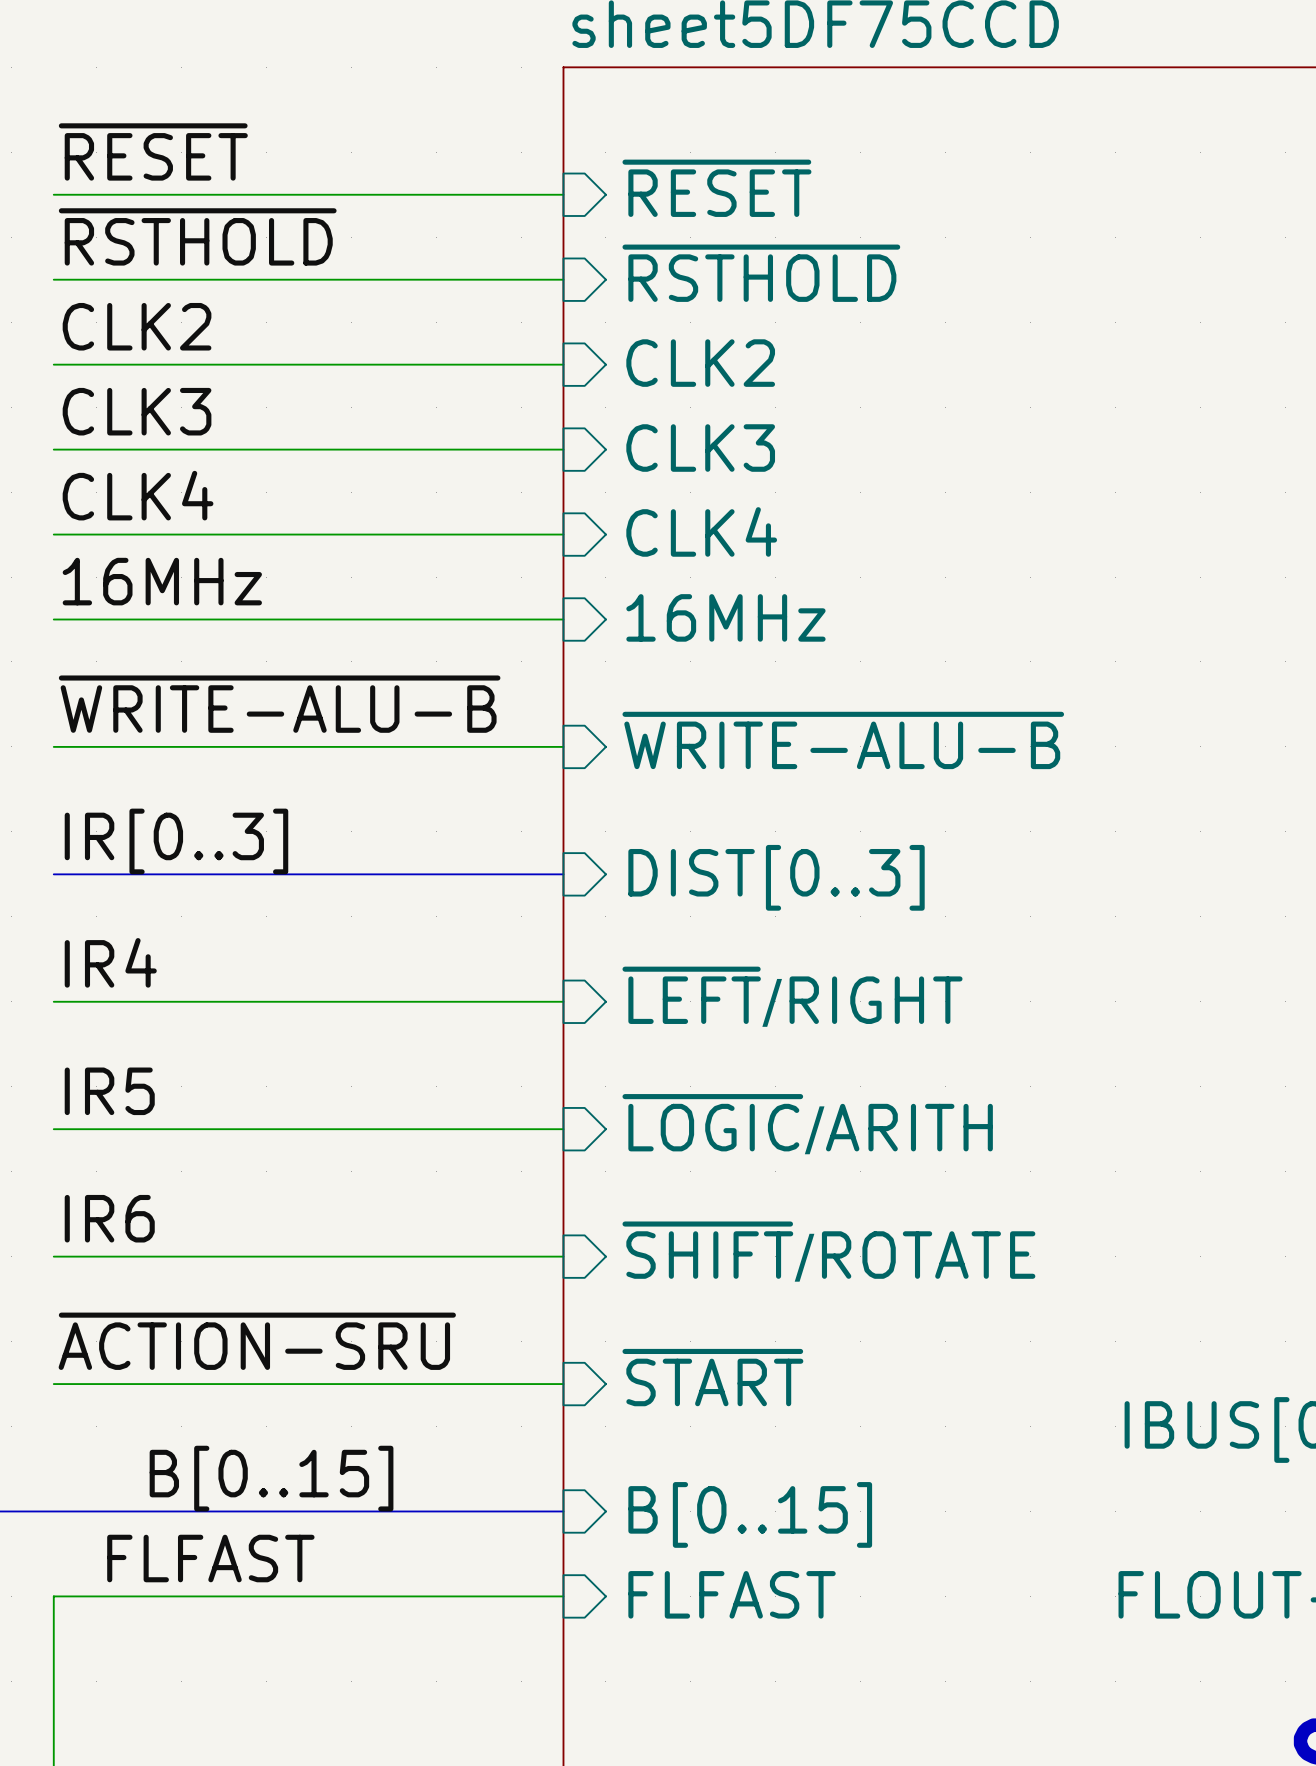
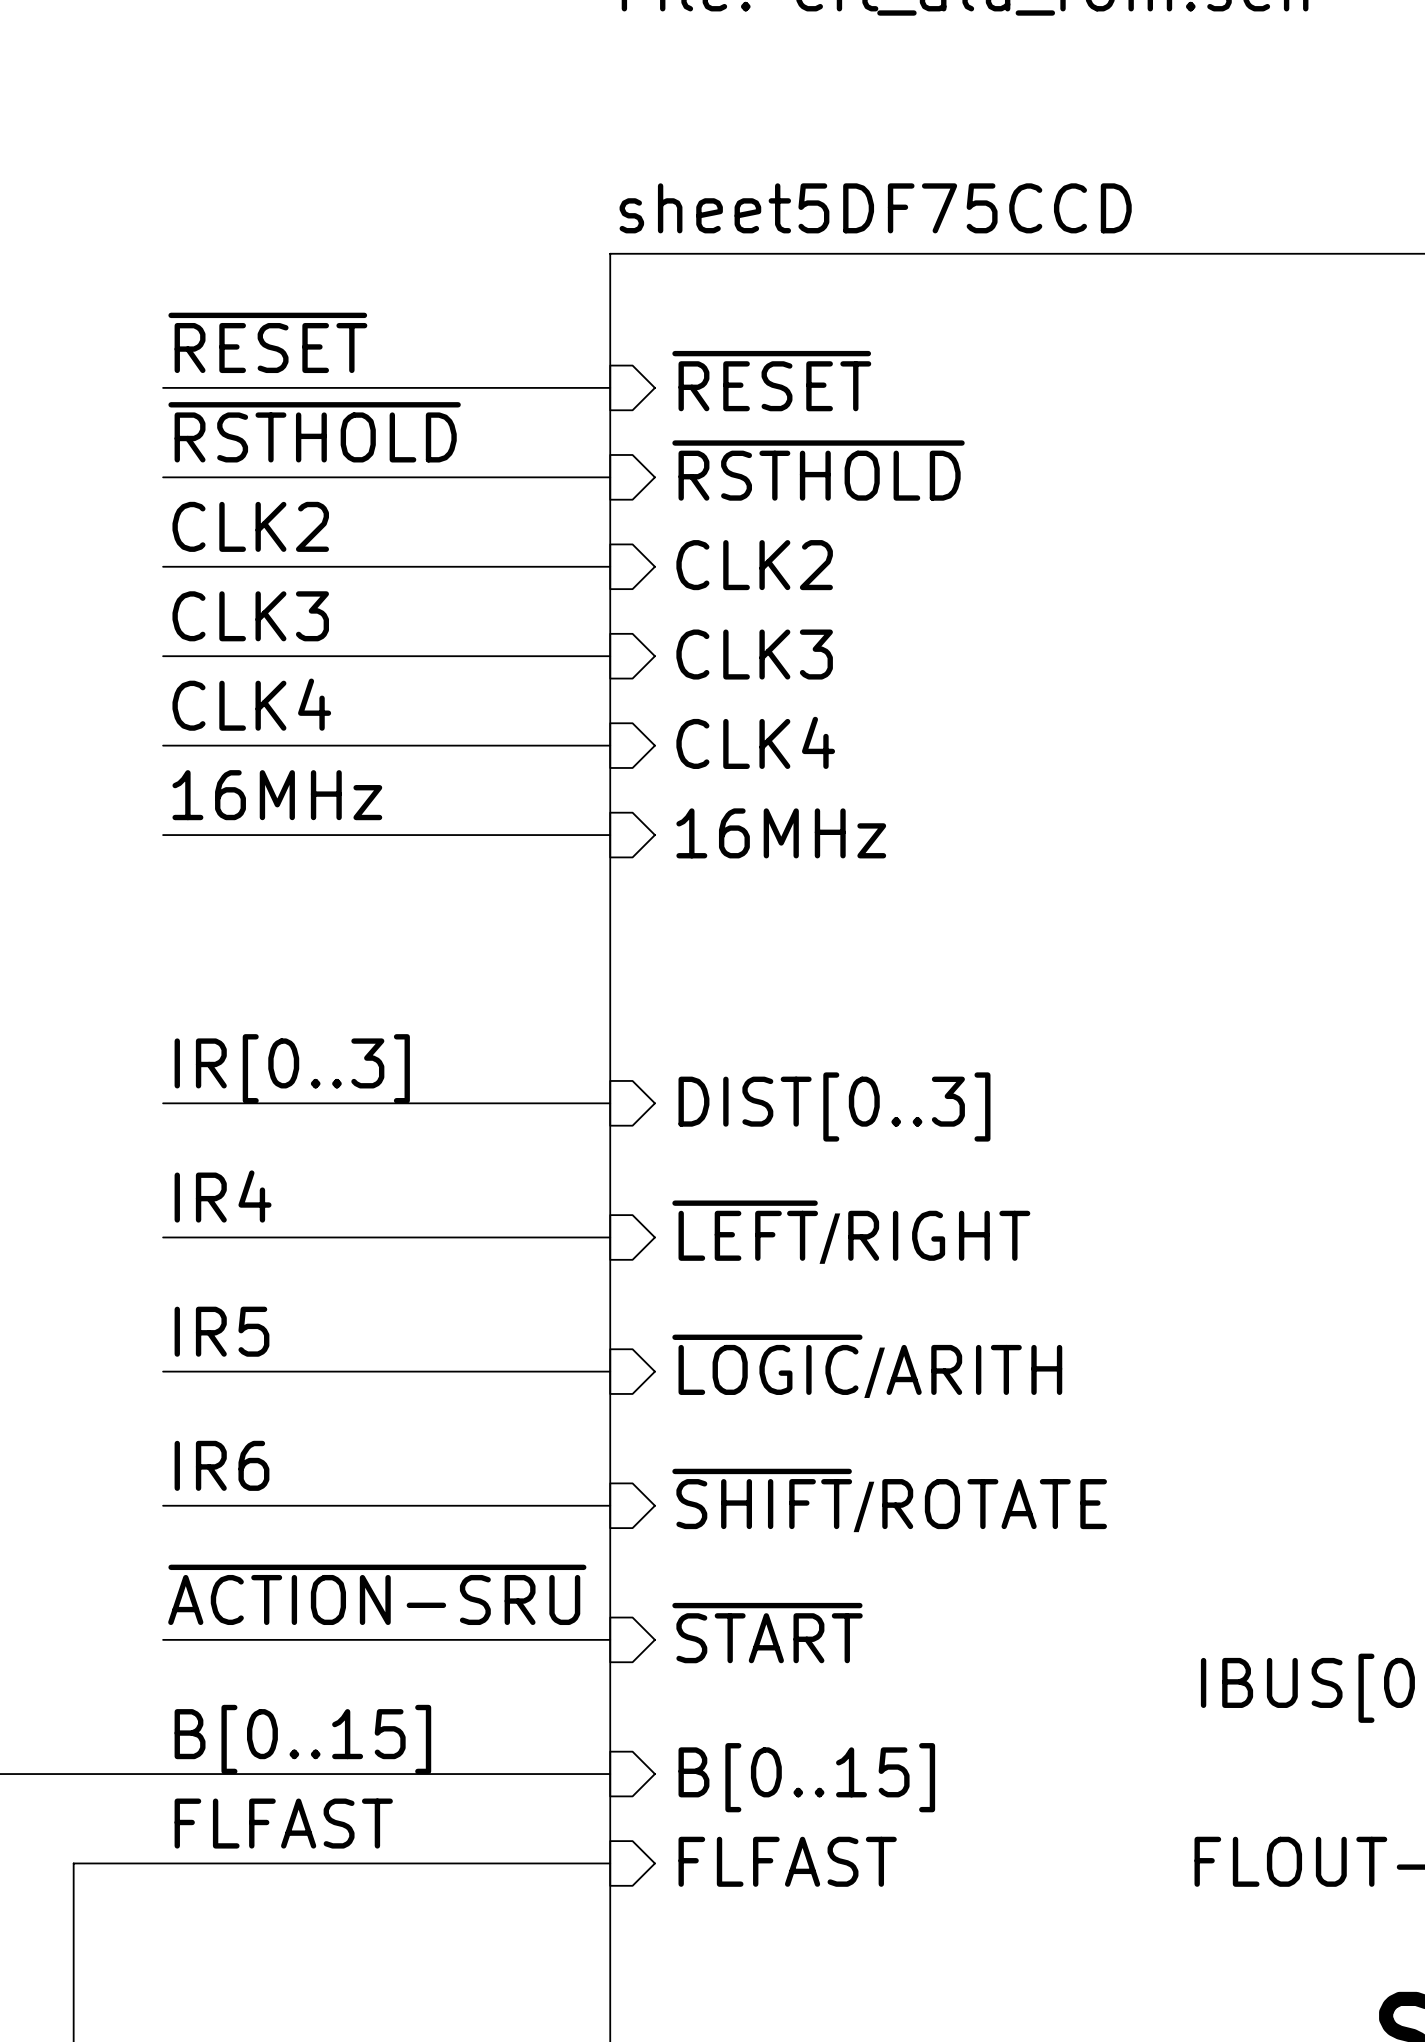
label position: ~{RESET} (153, 151) -> ~{RESET} (267, 342)
wire: (53, 194) (138, 194) -> none
label position: ~{RSTHOLD} (197, 236) -> ~{RSTHOLD} (314, 432)
wire: (53, 279) (138, 279) -> none
label position: CLK2 (137, 326) -> CLK2 (250, 526)
wire: (53, 364) (138, 364) -> none
label position: CLK3 (137, 411) -> CLK3 (250, 616)
wire: (53, 449) (138, 449) -> none
label position: CLK4 (138, 495) -> CLK4 (251, 704)
wire: (53, 534) (138, 534) -> none
label position: 16MHz (162, 581) -> 16MHz (277, 795)
wire: (53, 619) (138, 619) -> none
label: ~{WRITE-ALU-B} (279, 704) -> none
sheet pin: ~{WRITE-ALU-B} (843, 740) -> none
wire: (53, 746) (563, 746) -> none
label position: IR[0..3] (176, 841) -> IR[0..3] (292, 1068)
bus: (53, 874) (138, 874) -> none
label position: IR4 (110, 962) -> IR4 (223, 1196)
wire: (53, 1001) (138, 1001) -> none
label position: IR5 (109, 1091) -> IR5 (221, 1331)
wire: (53, 1129) (138, 1129) -> none
label position: IR6 (109, 1218) -> IR6 (221, 1465)
wire: (53, 1256) (138, 1256) -> none
label position: ~{ACTION-SRU} (257, 1341) -> ~{ACTION-SRU} (377, 1594)
wire: (53, 1384) (138, 1384) -> none
label position: FLFAST (210, 1558) -> FLFAST (283, 1823)

